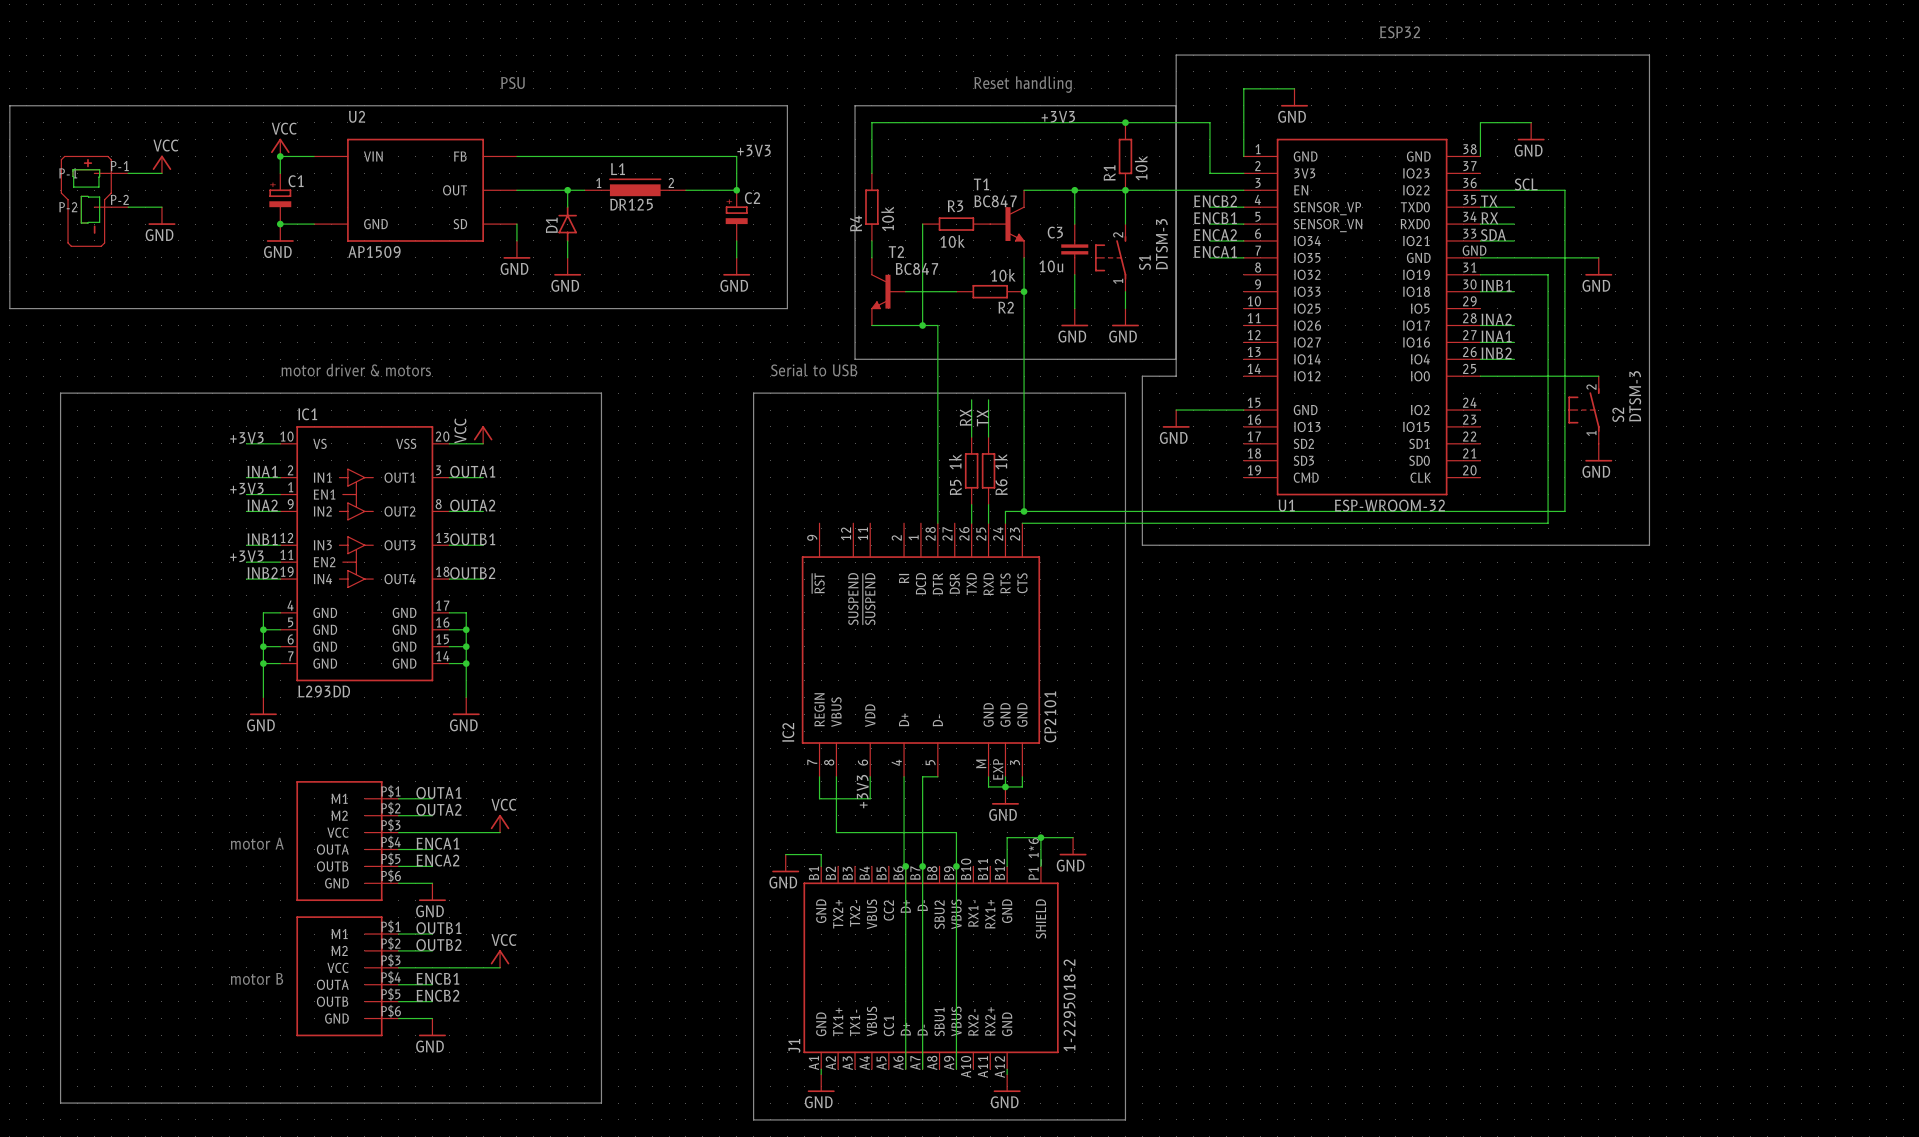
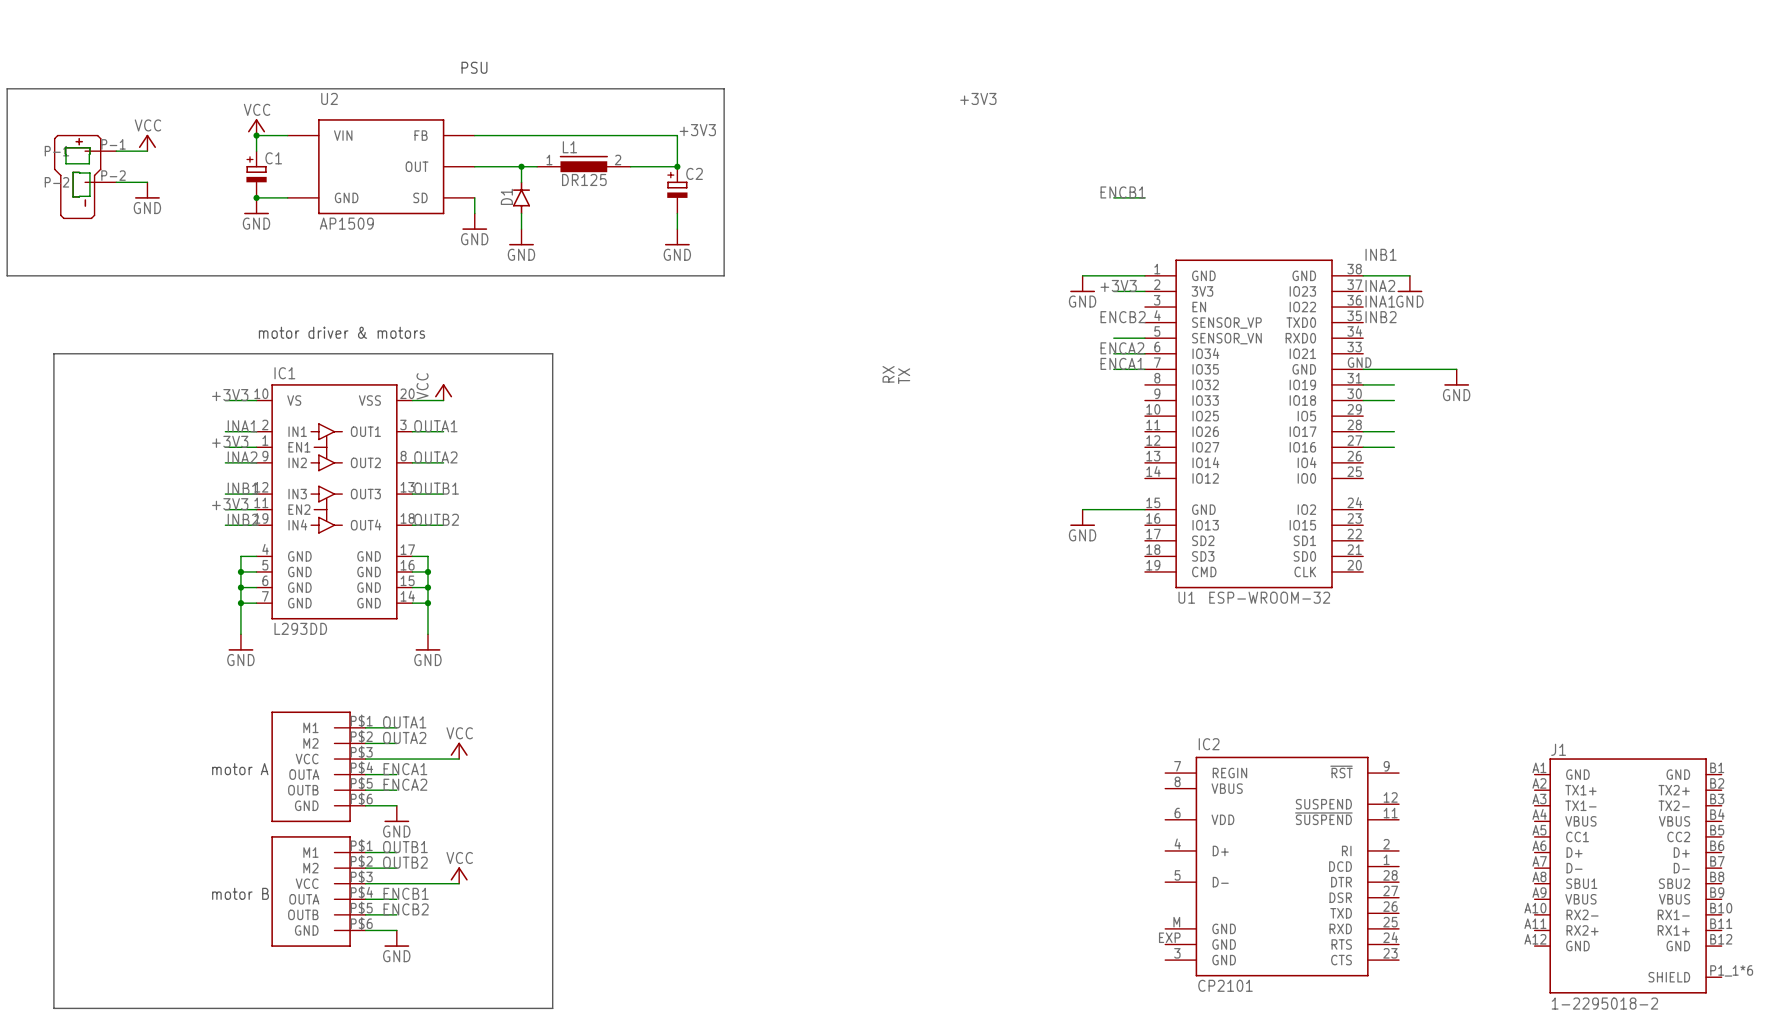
text: ESP32 (1400, 32) -> none
line: (1176, 55) (1176, 376) (1142, 376) (1142, 545) (1649, 545) (1649, 55) (1176, 55) -> none
text: Reset handling (1023, 84) -> none
wire: (1294, 88) (1243, 88) (1243, 156) -> none
power symbol: GND (1294, 97) -> none
line: (1176, 105) (855, 105) (855, 359) (1176, 359) -> none
junction: (1125, 122) -> none
wire: (1531, 122) (1480, 122) (1480, 156) -> none
power symbol: GND (1531, 131) -> none
R1: 10k (1125, 156) -> none
wire: (871, 173) (871, 122) (1209, 122) (1209, 173) (1243, 173) -> none
label: SCL (1526, 184) -> none
wire: (1024, 190) (1243, 190) -> none
wire: (1074, 190) (1074, 224) -> none
junction: (1074, 190) -> none
wire: (1125, 190) (1125, 224) -> none
junction: (1125, 190) -> none
wire: (1480, 190) (1564, 190) (1564, 511) (1005, 511) (1005, 523) -> none
label position: ENCB2 (1215, 201) -> ENCB2 (1123, 317)
label: TX (1489, 201) -> none
R4: 10k (871, 207) -> none
wire: (1209, 207) (1243, 207) -> (1113, 291) (1144, 291)
wire: (1480, 207) (1514, 207) -> none
label: RX (1489, 218) -> none
wire: (922, 224) (922, 325) -> none
R3: 10k (956, 224) -> none
T1: BC847 (1007, 224) -> none
wire: (1480, 224) (1514, 224) -> none
label position: ENCA2 (1215, 235) -> ENCA2 (1122, 348)
label: SDA (1493, 235) -> none
wire: (871, 240) (871, 257) -> none
wire: (1209, 240) (1243, 240) -> (1113, 338) (1144, 338)
wire: (1480, 240) (1514, 240) -> none
C3: 10u (1074, 249) -> none
label position: ENCA1 (1215, 252) -> ENCA1 (1122, 363)
wire: (1024, 257) (1024, 511) -> none
S1: DTSM-3 (1110, 257) -> none
wire: (1209, 257) (1243, 257) -> (1113, 353) (1144, 353)
wire: (1480, 257) (1598, 257) -> none
power symbol: GND (1598, 266) -> none
wire: (1074, 274) (1074, 308) -> none
wire: (1480, 274) (1548, 274) (1548, 523) (1022, 523) -> none
T2: BC847 (888, 291) -> none
wire: (905, 291) (956, 291) -> none
R2: 10k (990, 291) -> none
junction: (1024, 291) -> none
wire: (1125, 291) (1125, 308) -> none
wire: (1480, 291) (1514, 291) -> (1363, 384) (1394, 384)
wire: none -> (1082, 275) (1144, 275)
wire: none -> (1363, 275) (1409, 275)
power symbol: GND (1074, 317) -> none
power symbol: GND (1125, 317) -> none
power symbol: none -> GND (1082, 284)
U1 position: (1362, 317) -> (1254, 423)
power symbol: none -> GND (1409, 284)
label: none -> +3V3 (1118, 285)
wire: (871, 325) (937, 325) (937, 523) -> none
junction: (922, 325) -> none
wire: (1480, 325) (1514, 325) -> (1363, 400) (1394, 400)
wire: (1480, 342) (1514, 342) -> (1363, 431) (1394, 431)
wire: (1480, 359) (1514, 359) -> (1363, 447) (1394, 447)
text: Serial to USB (814, 369) -> none
wire: (1480, 376) (1598, 376) -> none
line: (753, 393) (753, 1119) (1125, 1119) (1125, 393) (753, 393) -> none
wire: (971, 399) (971, 437) -> none
wire: (988, 399) (988, 437) -> none
wire: (1176, 410) (1209, 410) -> none
wire: none -> (1363, 369) (1456, 369)
S2: DTSM-3 (1583, 410) -> none
power symbol: GND (1176, 418) -> none
power symbol position: GND (1598, 452) -> GND (1456, 377)
R5: 1k (971, 470) -> none
R6: 1k (988, 470) -> none
wire: (971, 504) (971, 523) -> none
wire: (988, 504) (988, 523) -> none
junction: (1024, 511) -> none
wire: none -> (1082, 509) (1144, 509)
power symbol: none -> GND (1082, 517)
IC2 rotation: 0° (920, 650) -> 90° clockwise (1282, 866)
IC2 position: (920, 650) -> (1282, 866)
wire: (819, 776) (819, 798) (870, 798) (870, 776) -> none
wire: (836, 776) (836, 832) (956, 832) (956, 1069) -> none
wire: (904, 776) (905, 1069) -> none
wire: (937, 776) (922, 776) (922, 1069) -> none
wire: (988, 776) (988, 786) (1022, 786) (1022, 776) -> none
wire: (1005, 776) (1005, 786) -> none
junction: (1005, 786) -> none
label: +3V3 (862, 791) -> none
power symbol: GND (1005, 795) -> none
wire: (1040, 837) (1040, 866) -> none
junction: (1040, 837) -> none
wire: (1073, 837) (1007, 837) (1007, 866) -> none
power symbol: GND (1073, 846) -> none
wire: (785, 854) (821, 854) (821, 866) -> none
power symbol: GND (785, 863) -> none
junction: (905, 866) -> none
junction: (922, 866) -> none
junction: (956, 866) -> none
J1 rotation: 0° (931, 967) -> 90° clockwise (1628, 875)
J1 position: (931, 967) -> (1628, 875)
wire: (821, 1069) (821, 1074) -> none
wire: (1007, 1069) (1007, 1074) -> none
power symbol: GND (821, 1083) -> none
power symbol: GND (1007, 1083) -> none

